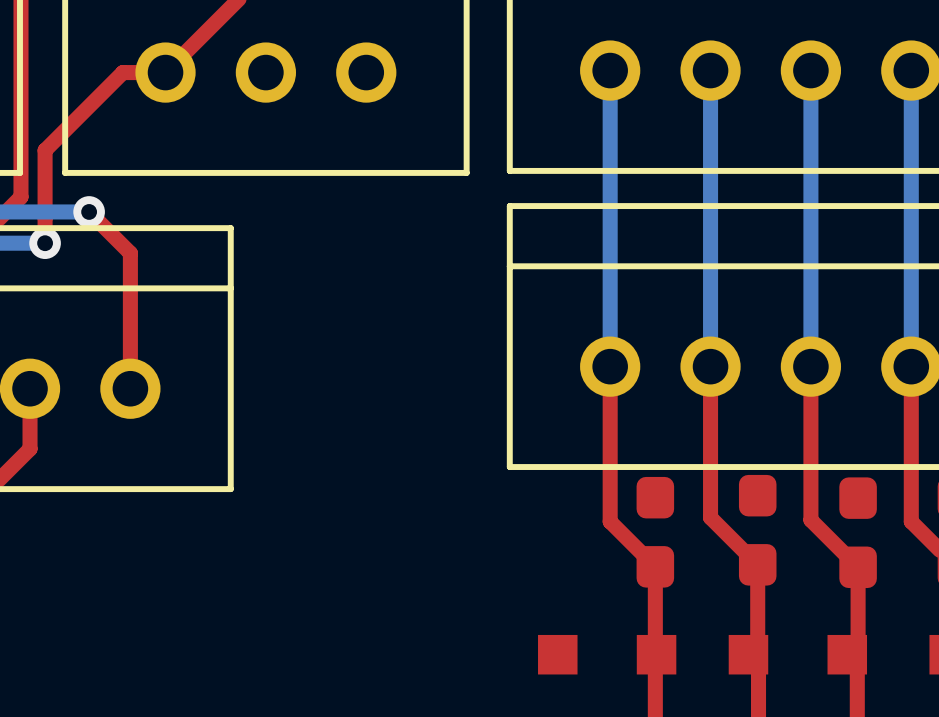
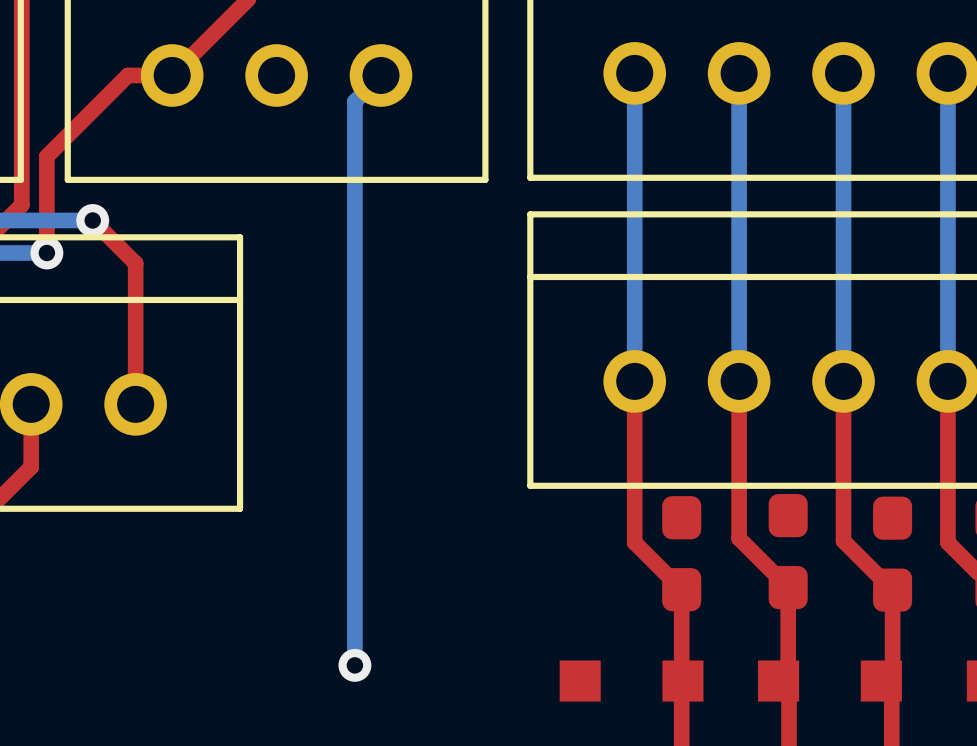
bottom track: none -> (381, 75) (354, 101) (354, 665)
via: none -> (354, 665)

